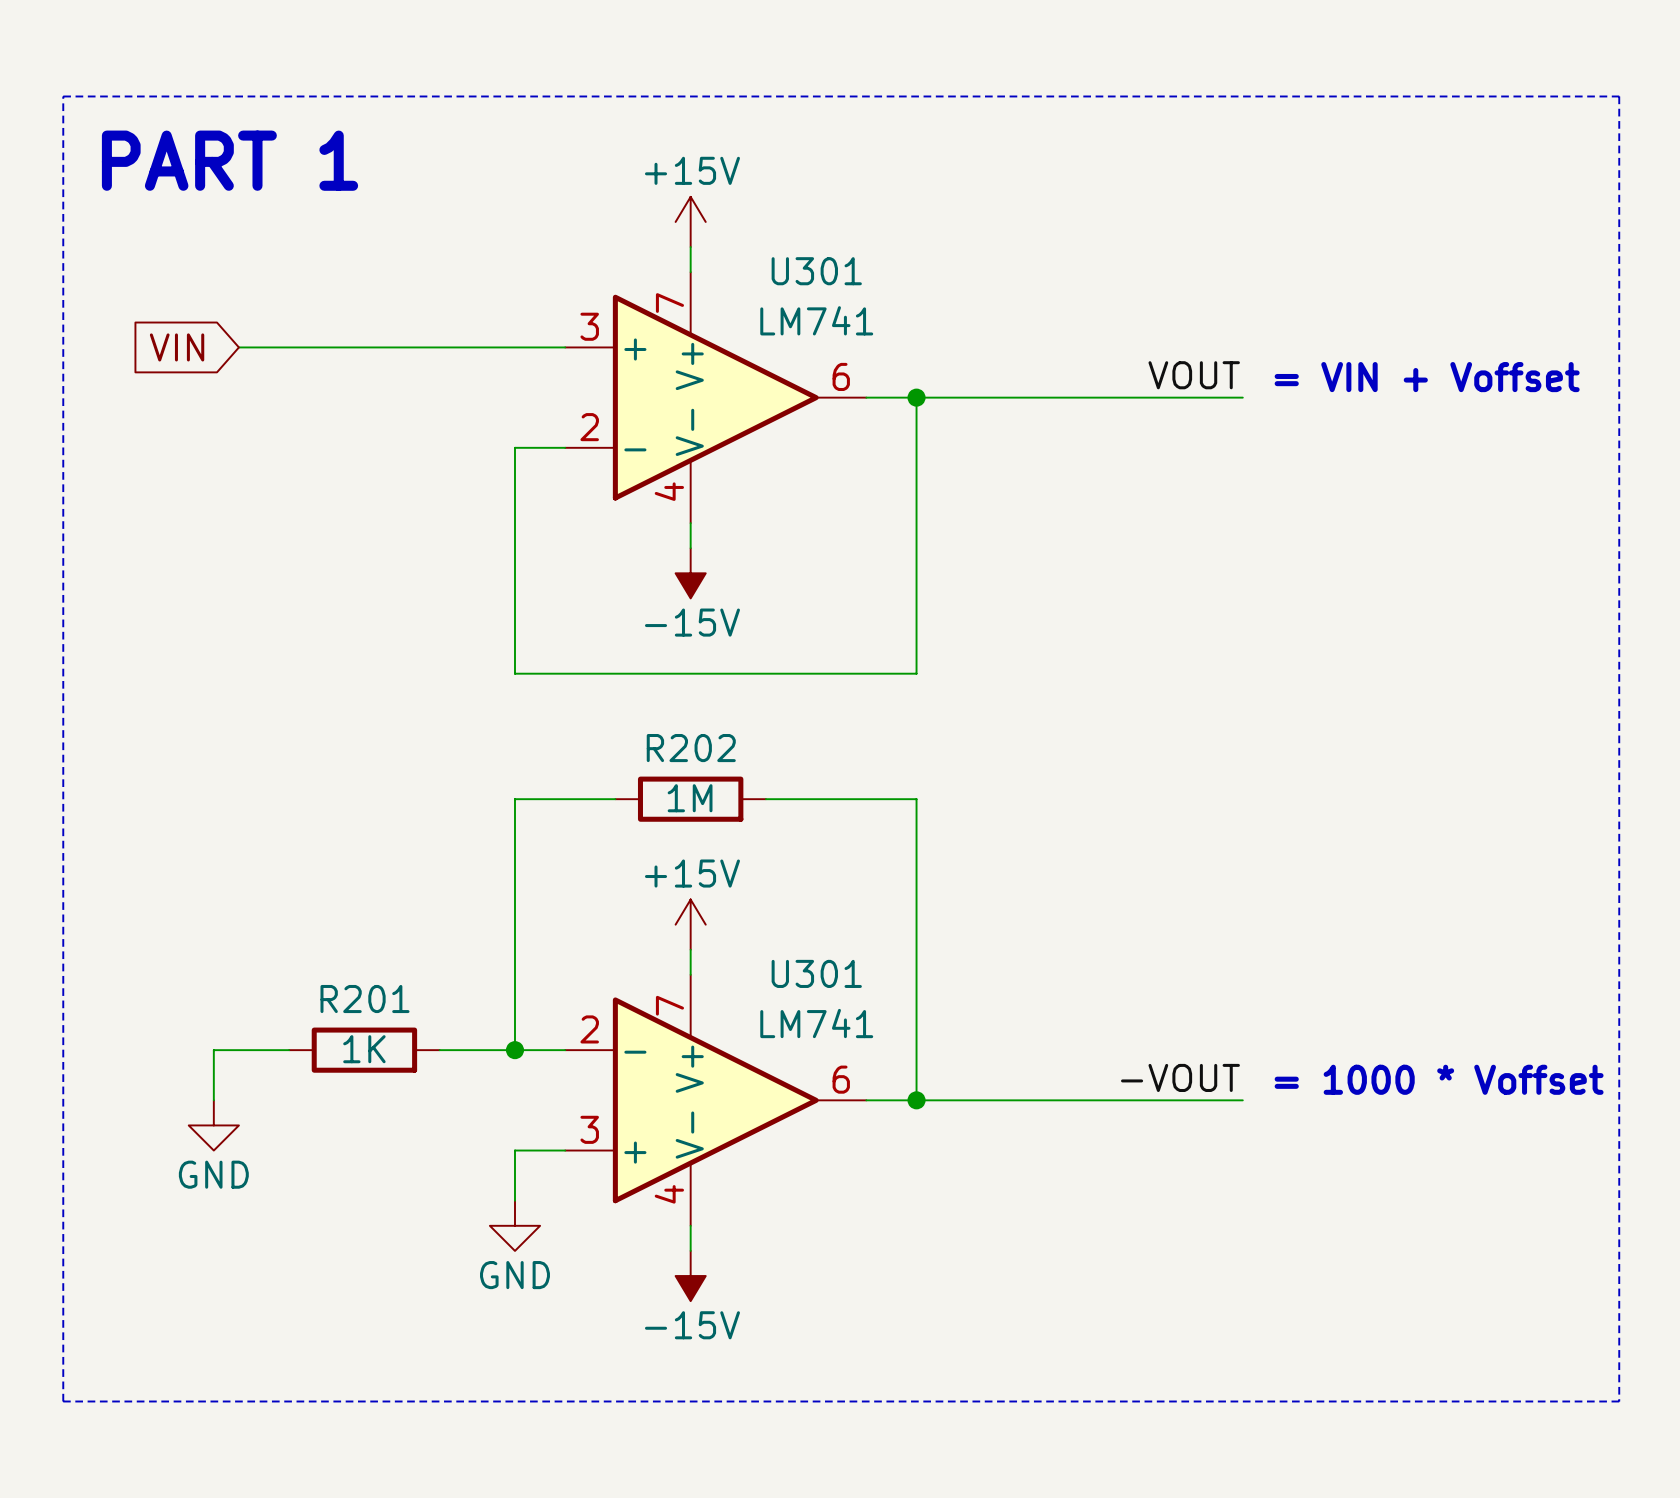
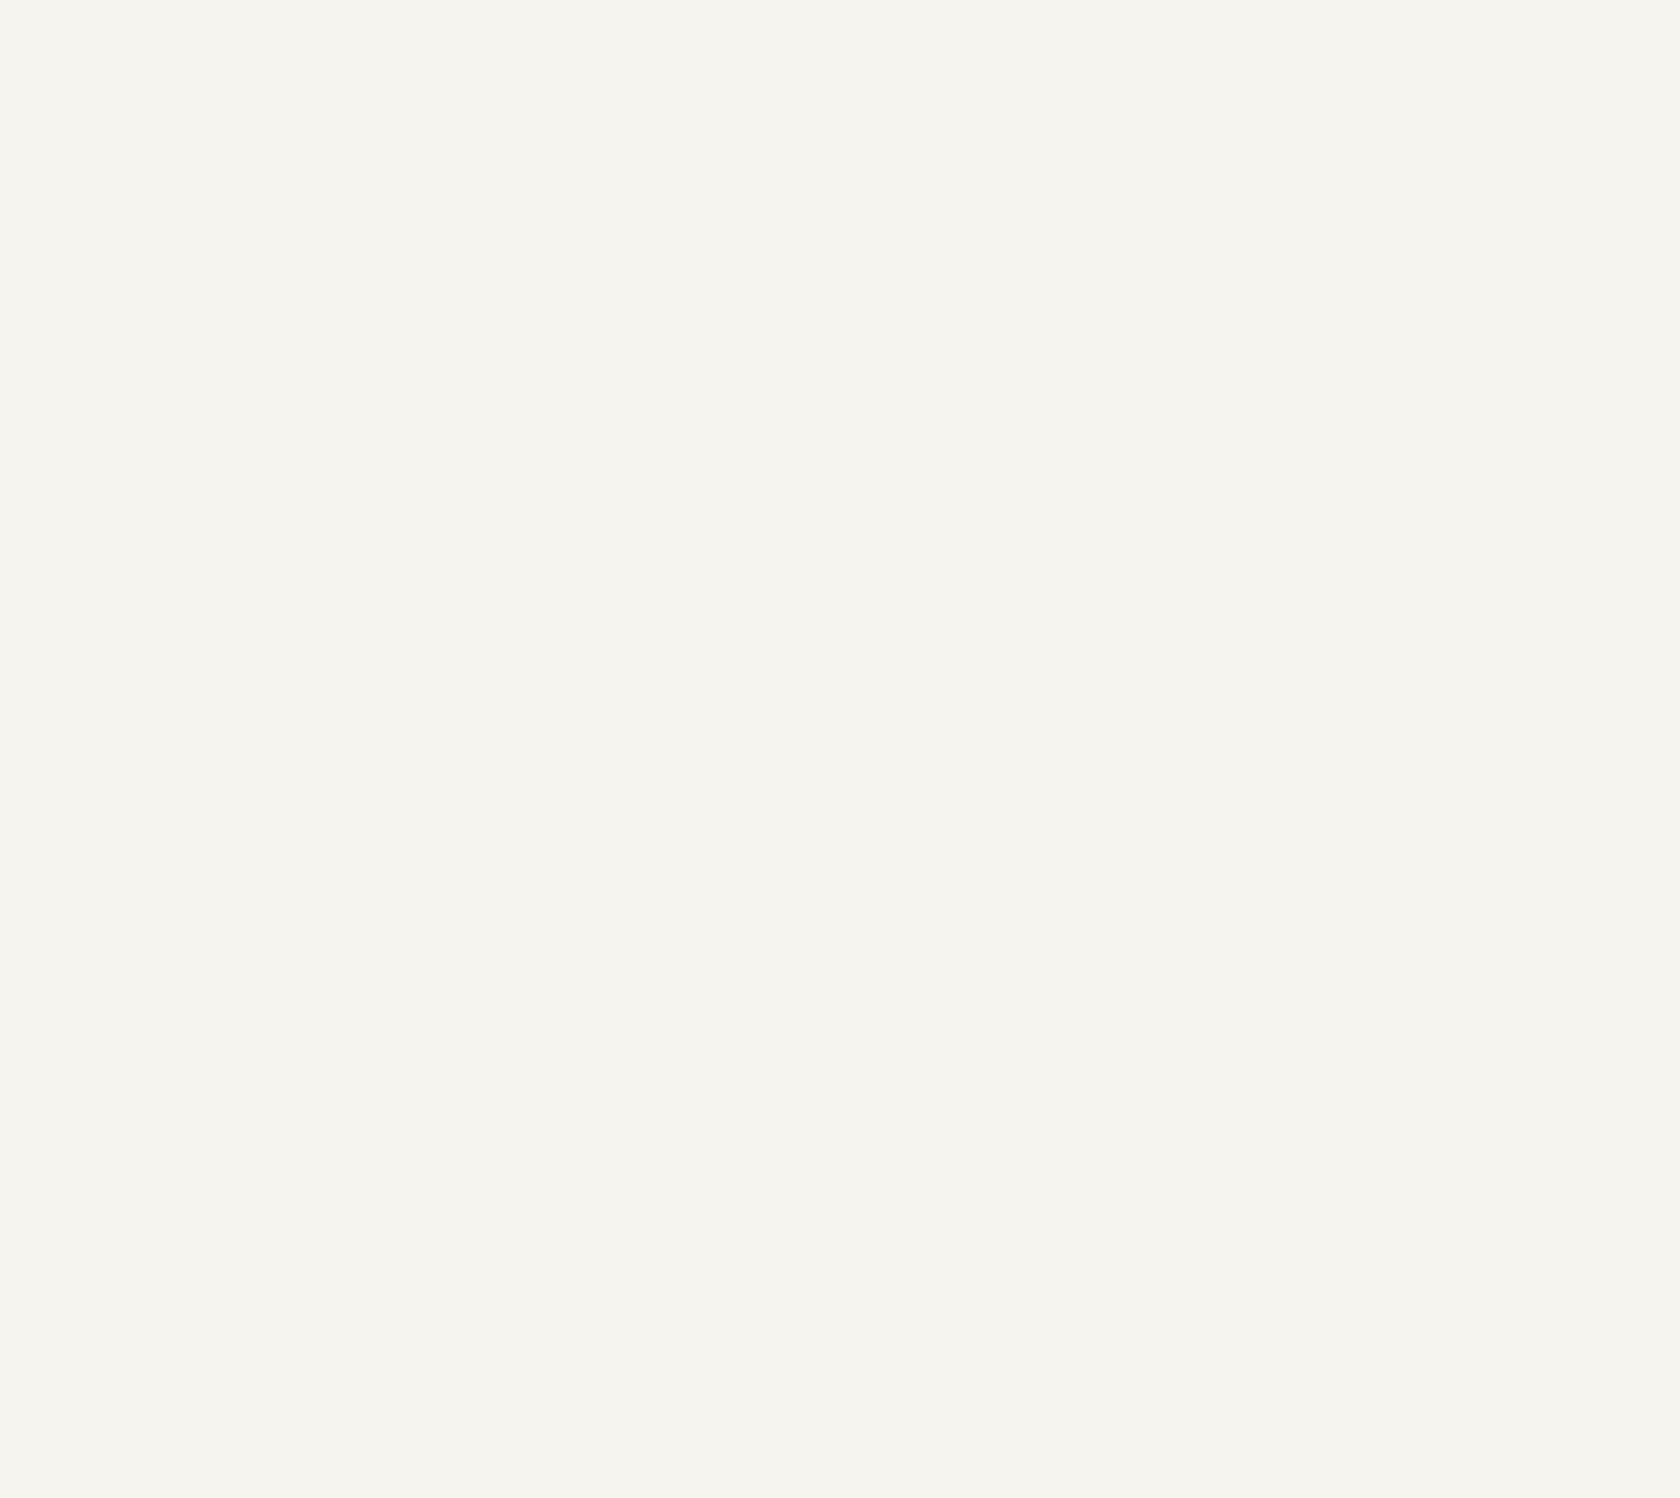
line: (63, 96) (1619, 96) (1619, 1401) (63, 1401) (63, 96) -> none
text: PART 1 (230, 160) -> none
power symbol: +15V (690, 221) -> none
wire: (690, 247) (690, 272) -> none
global label: VIN (177, 347) -> none
wire: (238, 347) (565, 347) -> none
label: VOUT (1194, 375) -> none
text: = VIN + Voffset (1427, 377) -> none
U301: LM741 (715, 397) -> none
wire: (866, 397) (1242, 397) -> none
wire: (916, 397) (916, 673) (514, 673) (514, 447) (565, 447) -> none
junction: (916, 397) -> none
wire: (690, 523) (690, 548) -> none
power symbol: -15V (690, 573) -> none
wire: (615, 799) (514, 799) (514, 1050) -> none
R202: 1M (690, 799) -> none
wire: (765, 799) (916, 799) (916, 1100) -> none
power symbol: +15V (690, 924) -> none
wire: (690, 949) (690, 974) -> none
wire: (289, 1050) (213, 1050) (213, 1100) -> none
R201: 1K (364, 1050) -> none
wire: (439, 1050) (565, 1050) -> none
junction: (514, 1050) -> none
label: -VOUT (1180, 1077) -> none
text: = 1000 * Voffset (1439, 1079) -> none
U301: LM741 (715, 1100) -> none
wire: (866, 1100) (1242, 1100) -> none
junction: (916, 1100) -> none
power symbol: GND (213, 1125) -> none
wire: (565, 1150) (514, 1150) (514, 1200) -> none
power symbol: GND (514, 1225) -> none
wire: (690, 1225) (690, 1250) -> none
power symbol: -15V (690, 1276) -> none

